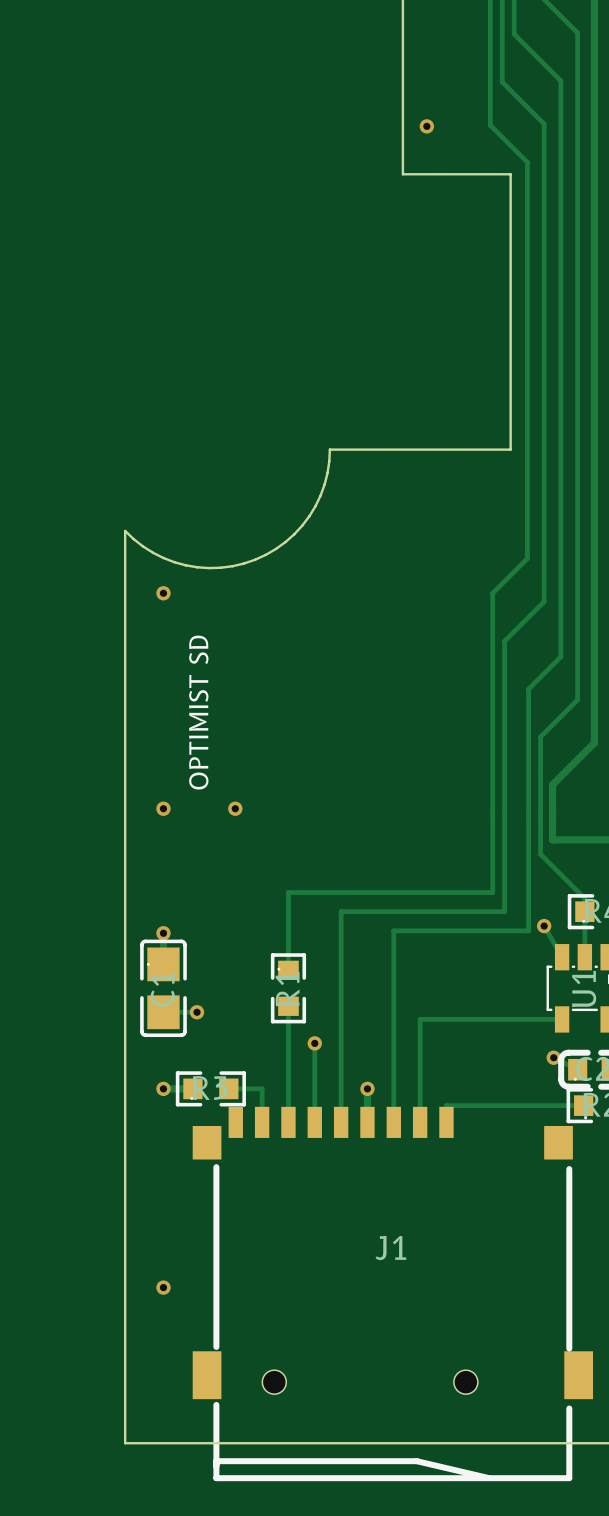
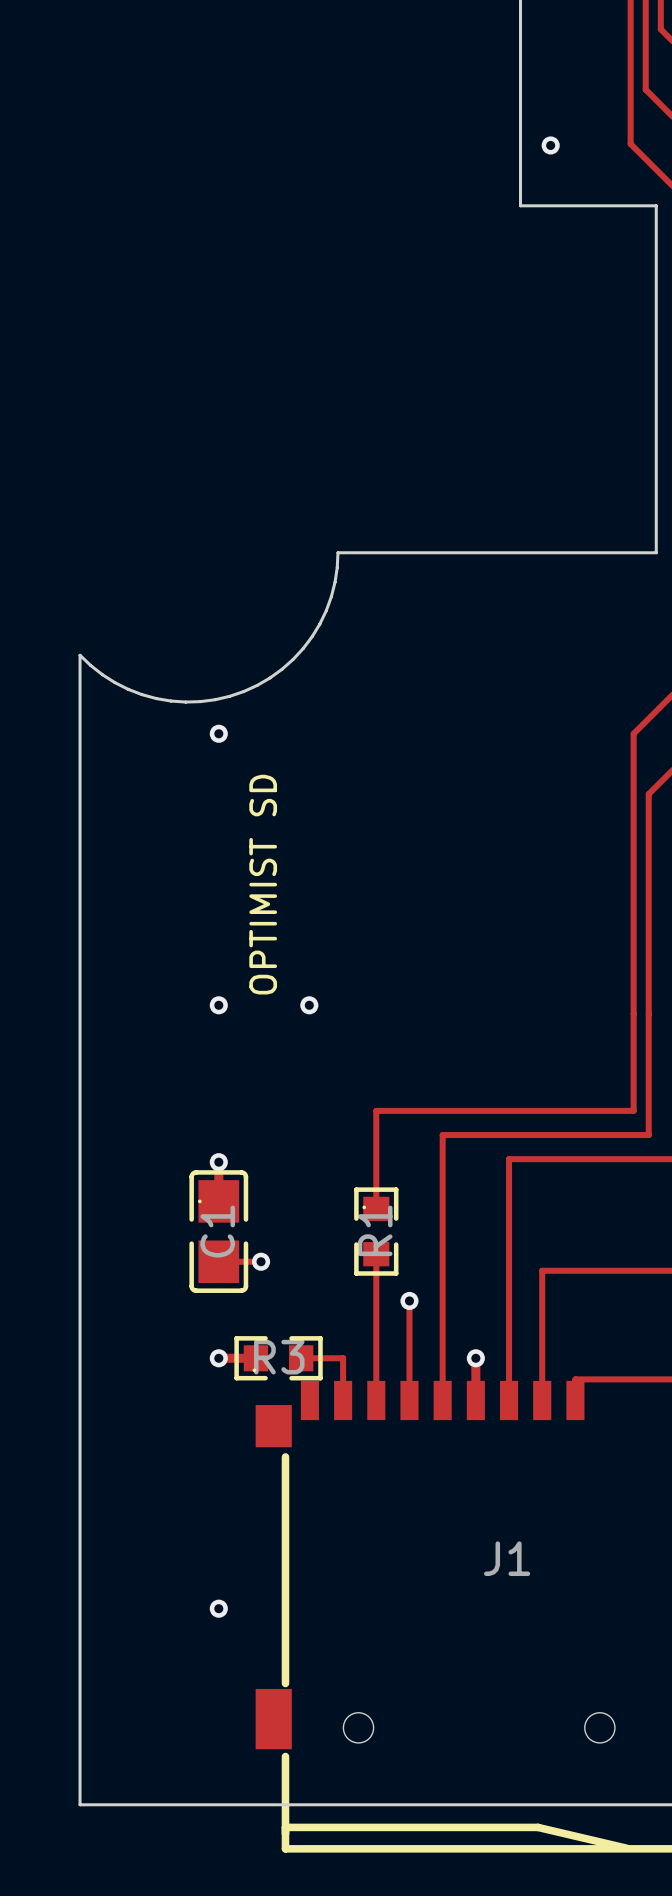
board edge: (329, 449) (324, 484) (309, 516) (285, 542) (255, 559) (220, 567) (185, 565) (152, 552) (125, 530) (125, 1443) -> (428, 552) (337, 552) (331, 596) (312, 636) (282, 669) (257, 685) (229, 696) (200, 701) (156, 698) (114, 682) (80, 655) (80, 1804) (170, 1804)

